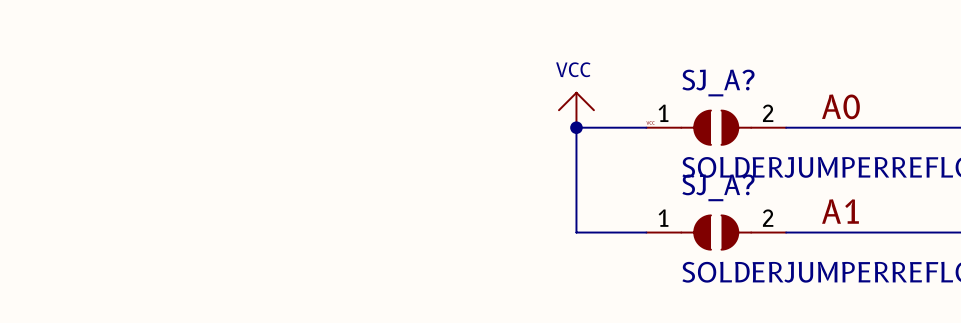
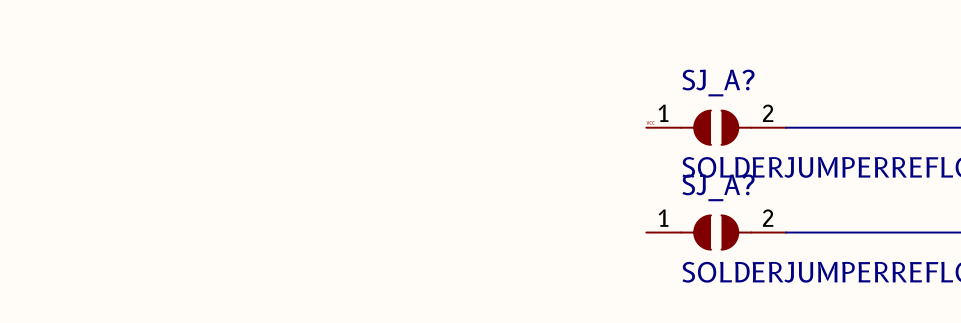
label: A0 (840, 106) -> none
power symbol: VCC (576, 110) -> none
junction: (576, 127) -> none
wire: (646, 127) (576, 127) (576, 232) (646, 232) -> none
label: A1 (840, 211) -> none

